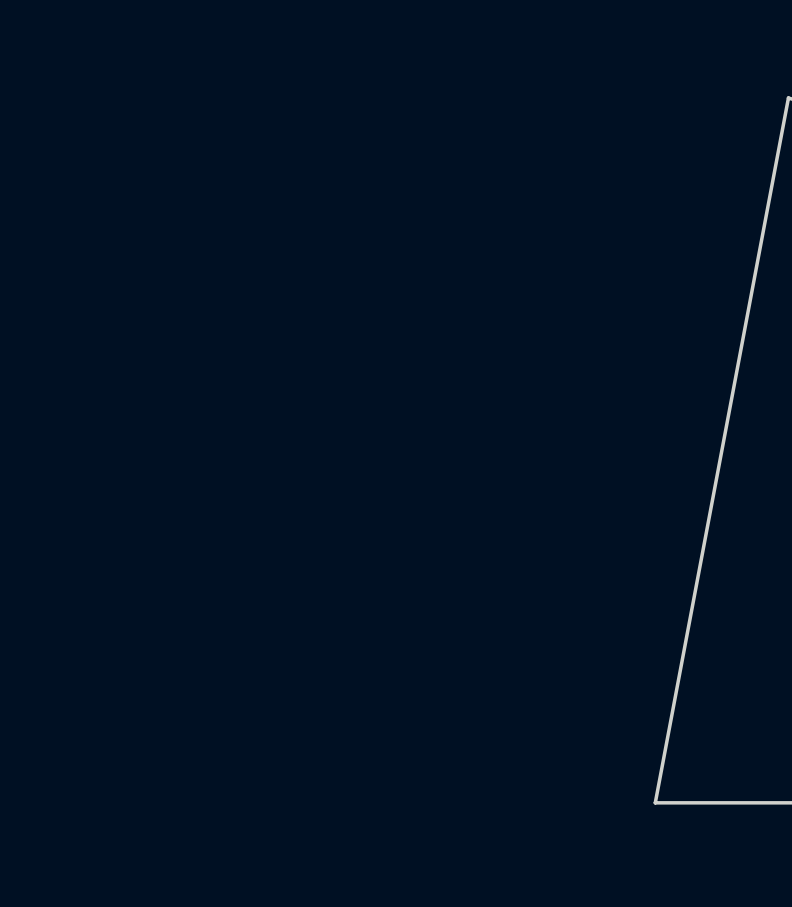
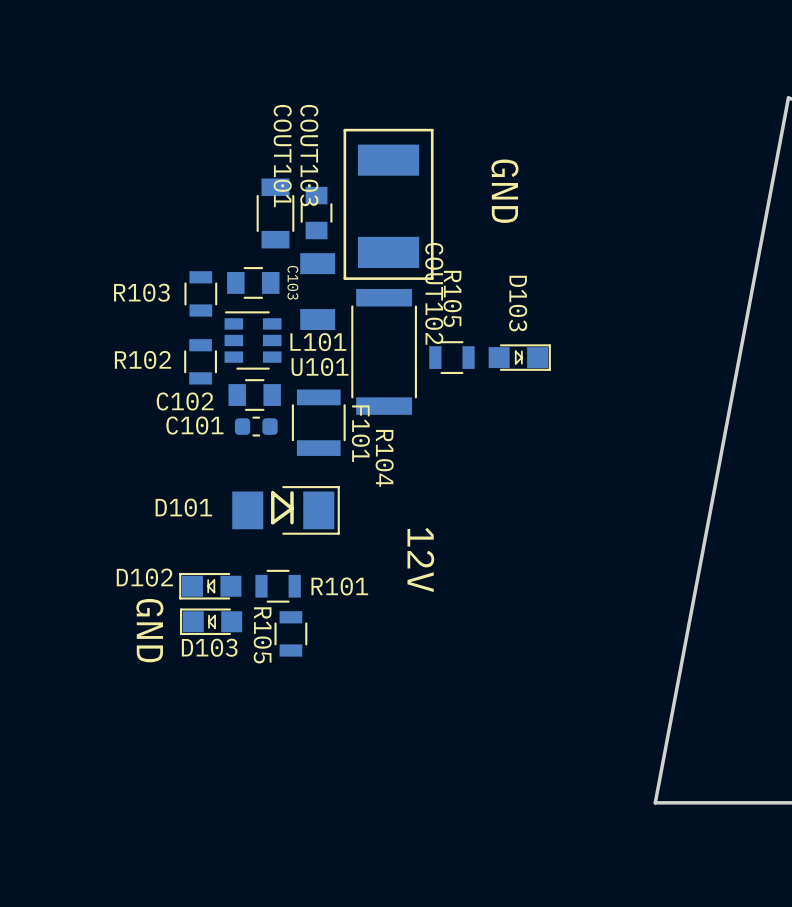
text: none -> GND (504, 191)
COUT102: none -> (388, 204)
COUT101: none -> (275, 213)
COUT103: none -> (316, 213)
C103: none -> (253, 282)
L101: none -> (317, 291)
R103: none -> (200, 293)
U101: none -> (253, 340)
R104: none -> (384, 351)
R105: none -> (451, 357)
D103: none -> (519, 357)
R102: none -> (200, 361)
C102: none -> (254, 395)
F101: none -> (318, 422)
C101: none -> (256, 426)
D101: none -> (286, 510)
text: none -> 12V (420, 559)
D102: none -> (210, 586)
R101: none -> (278, 586)
D103: none -> (211, 621)
text: none -> GND (149, 630)
R105: none -> (290, 633)

